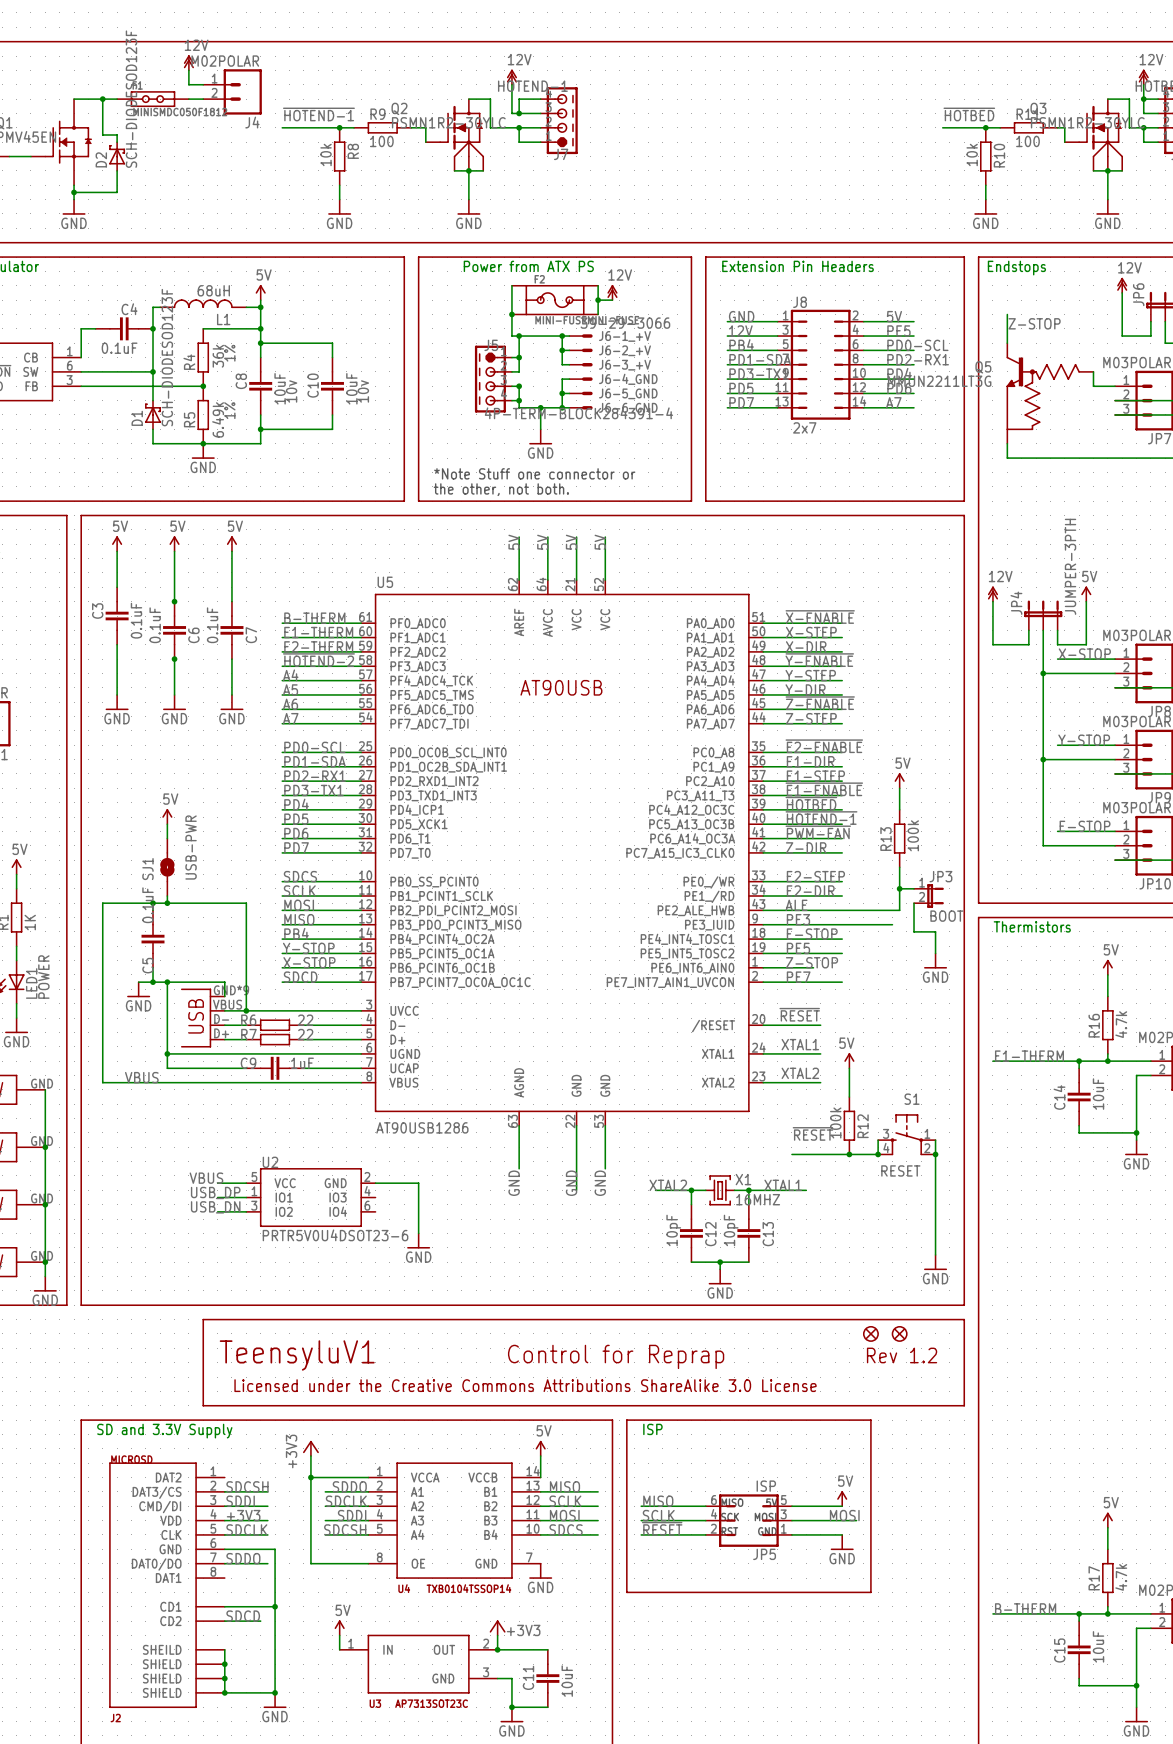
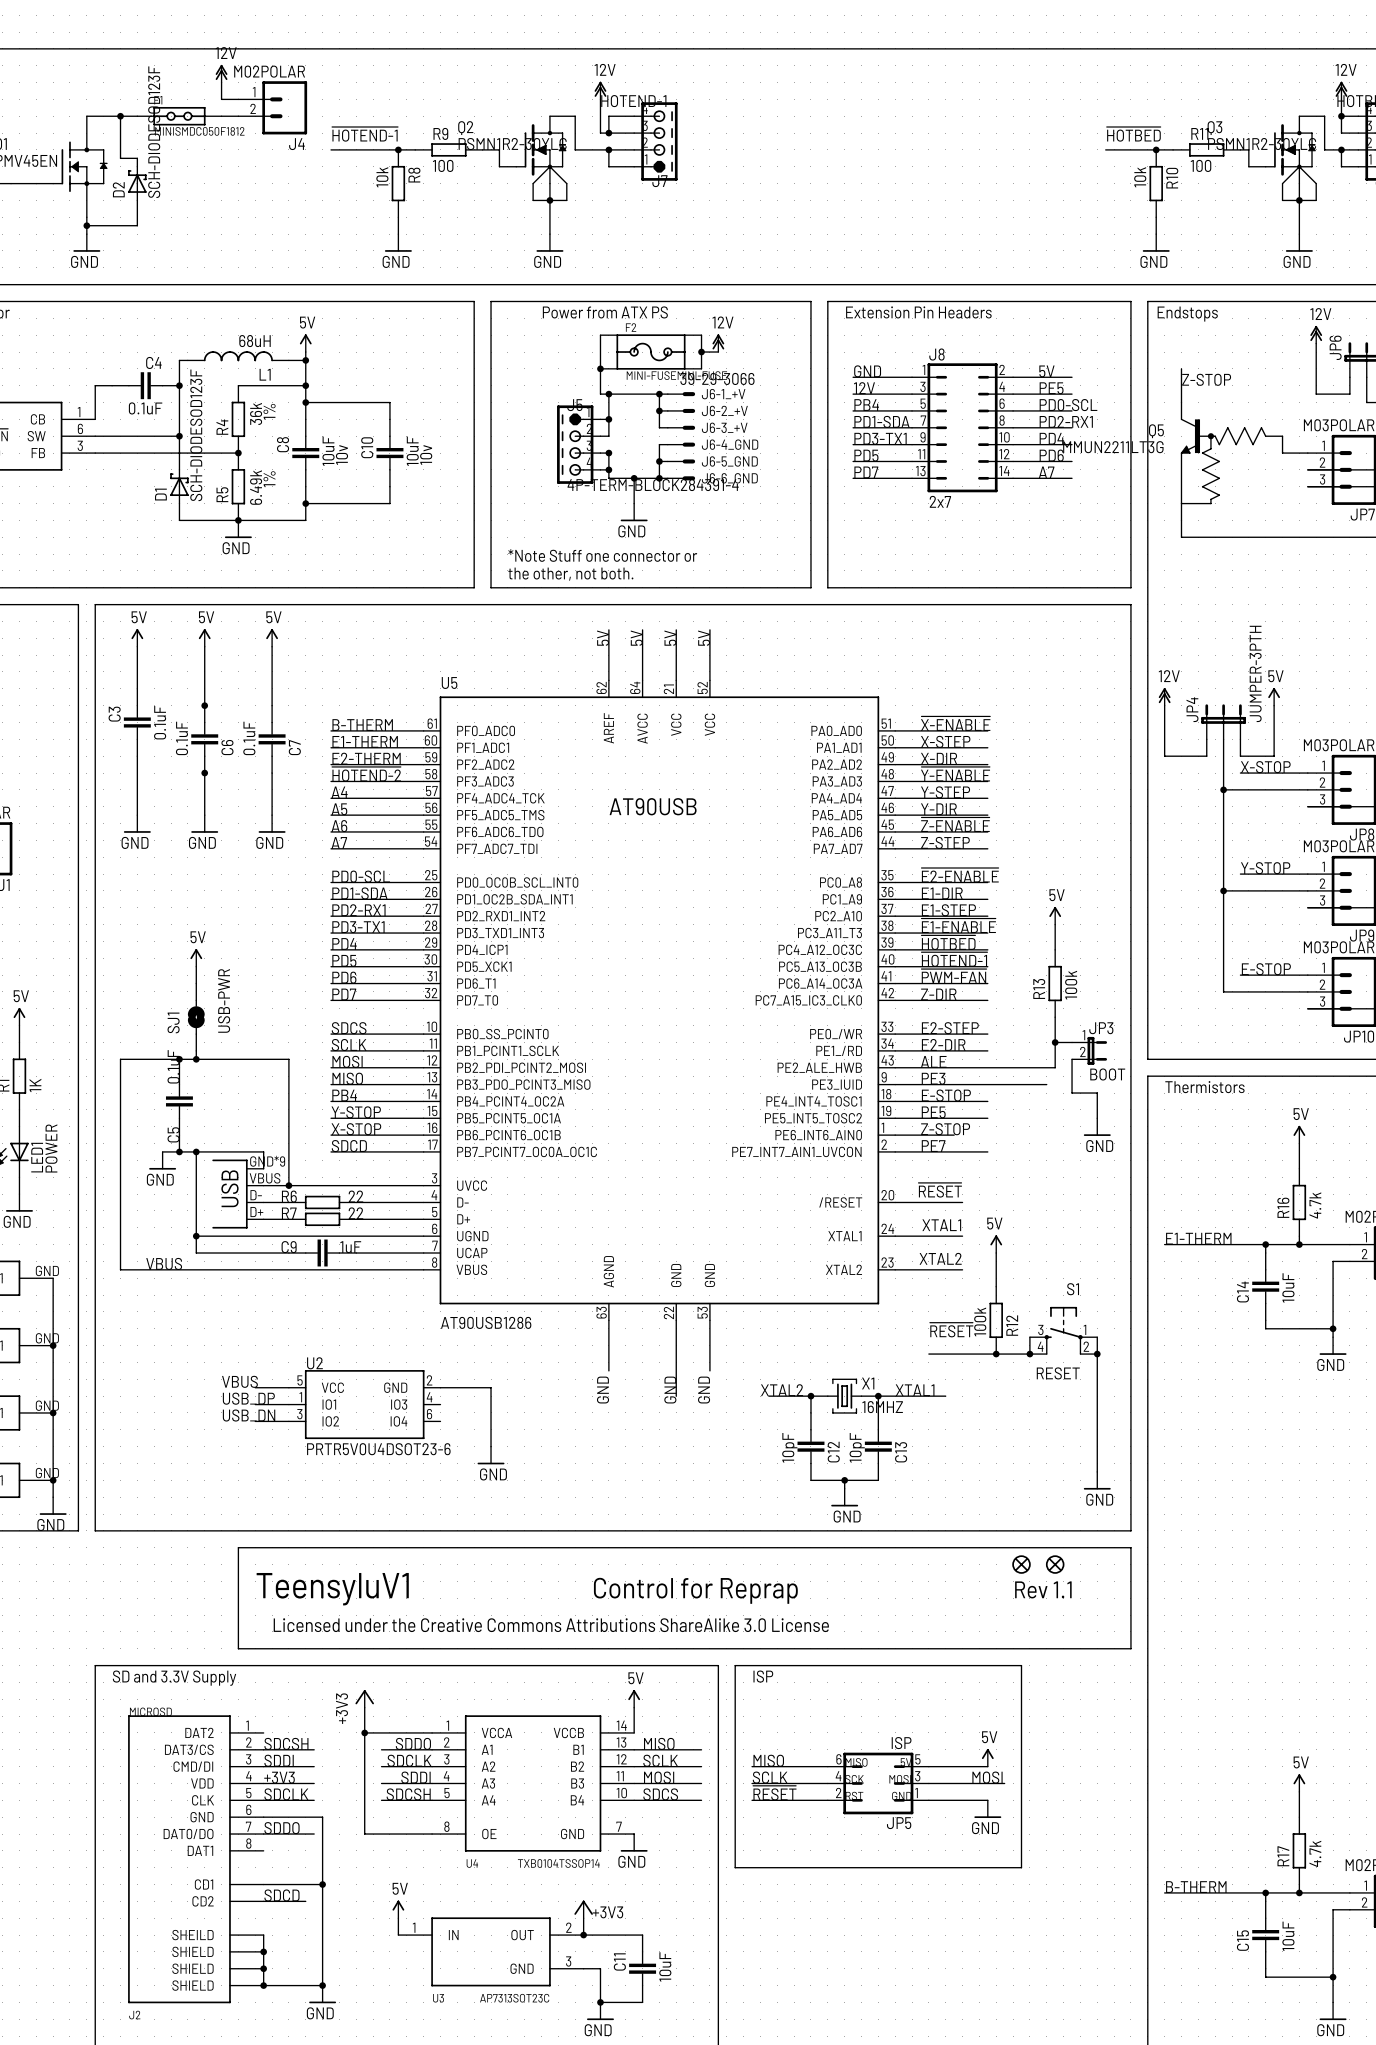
text: Rev 1.2 (902, 1355) -> Rev 1.1 (1043, 1589)

